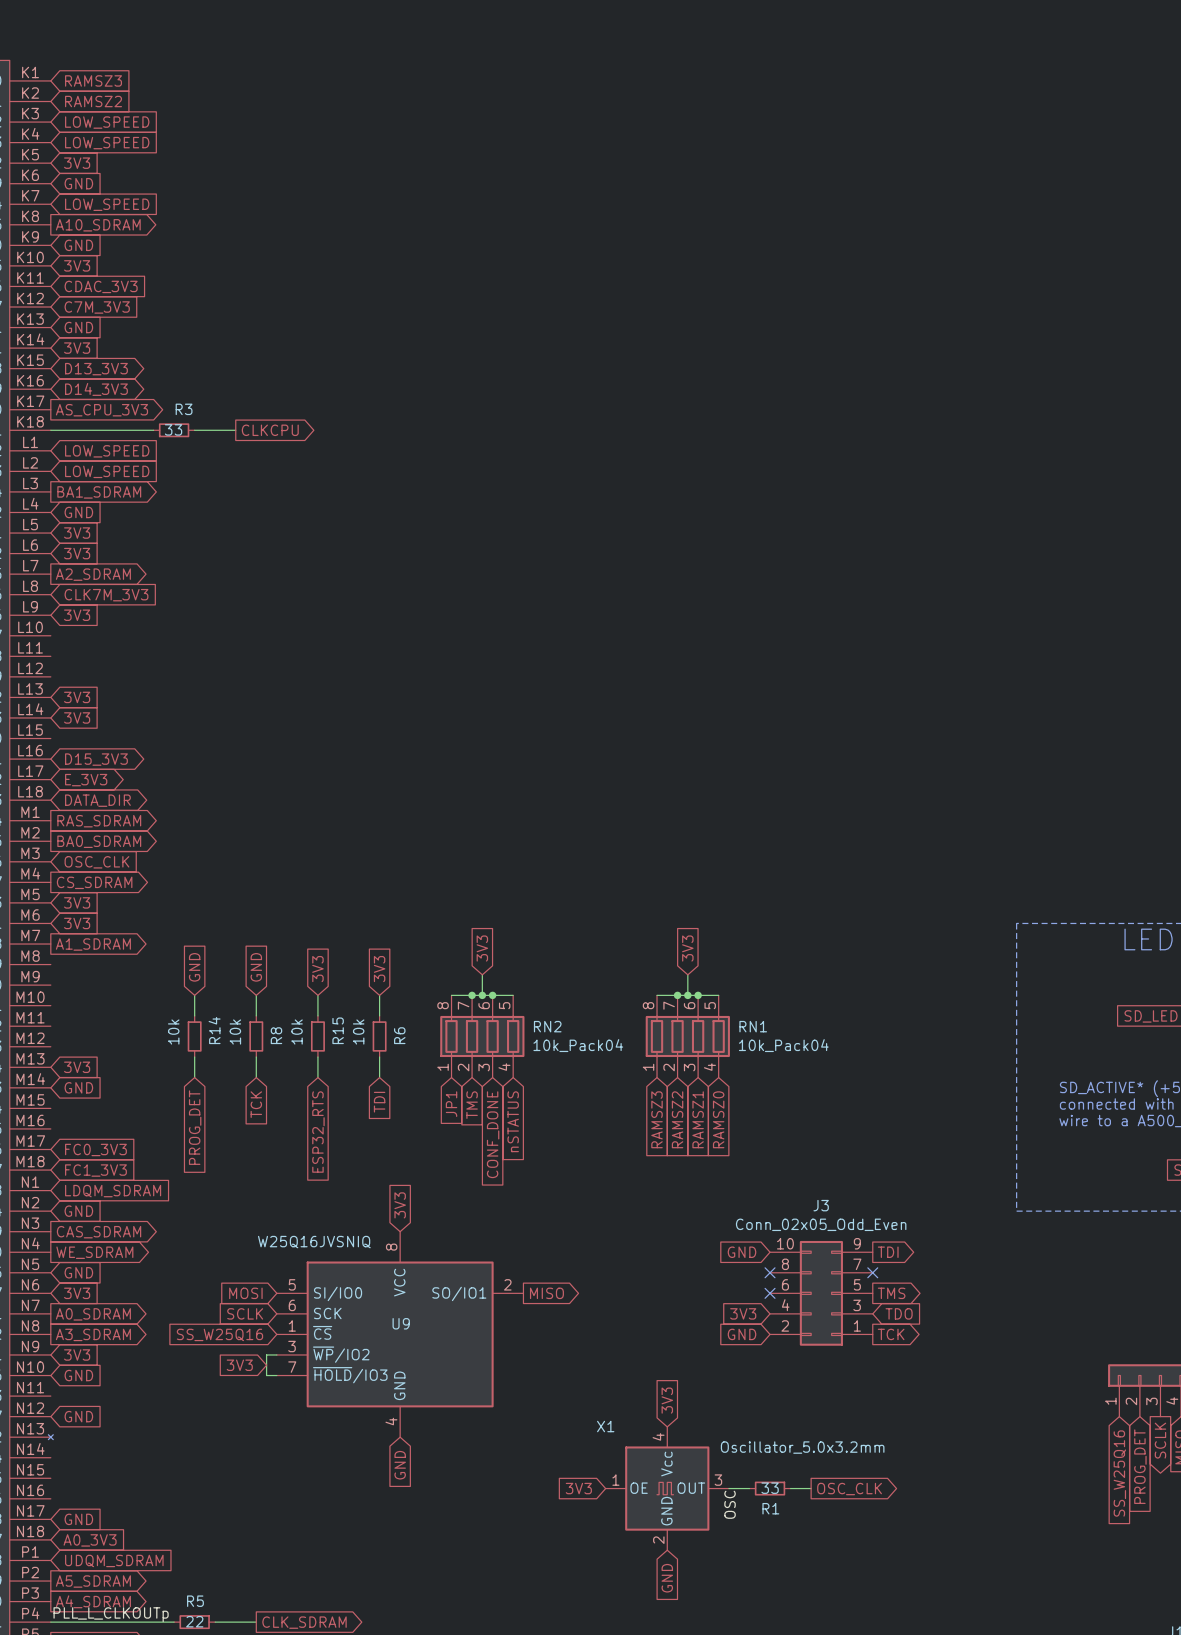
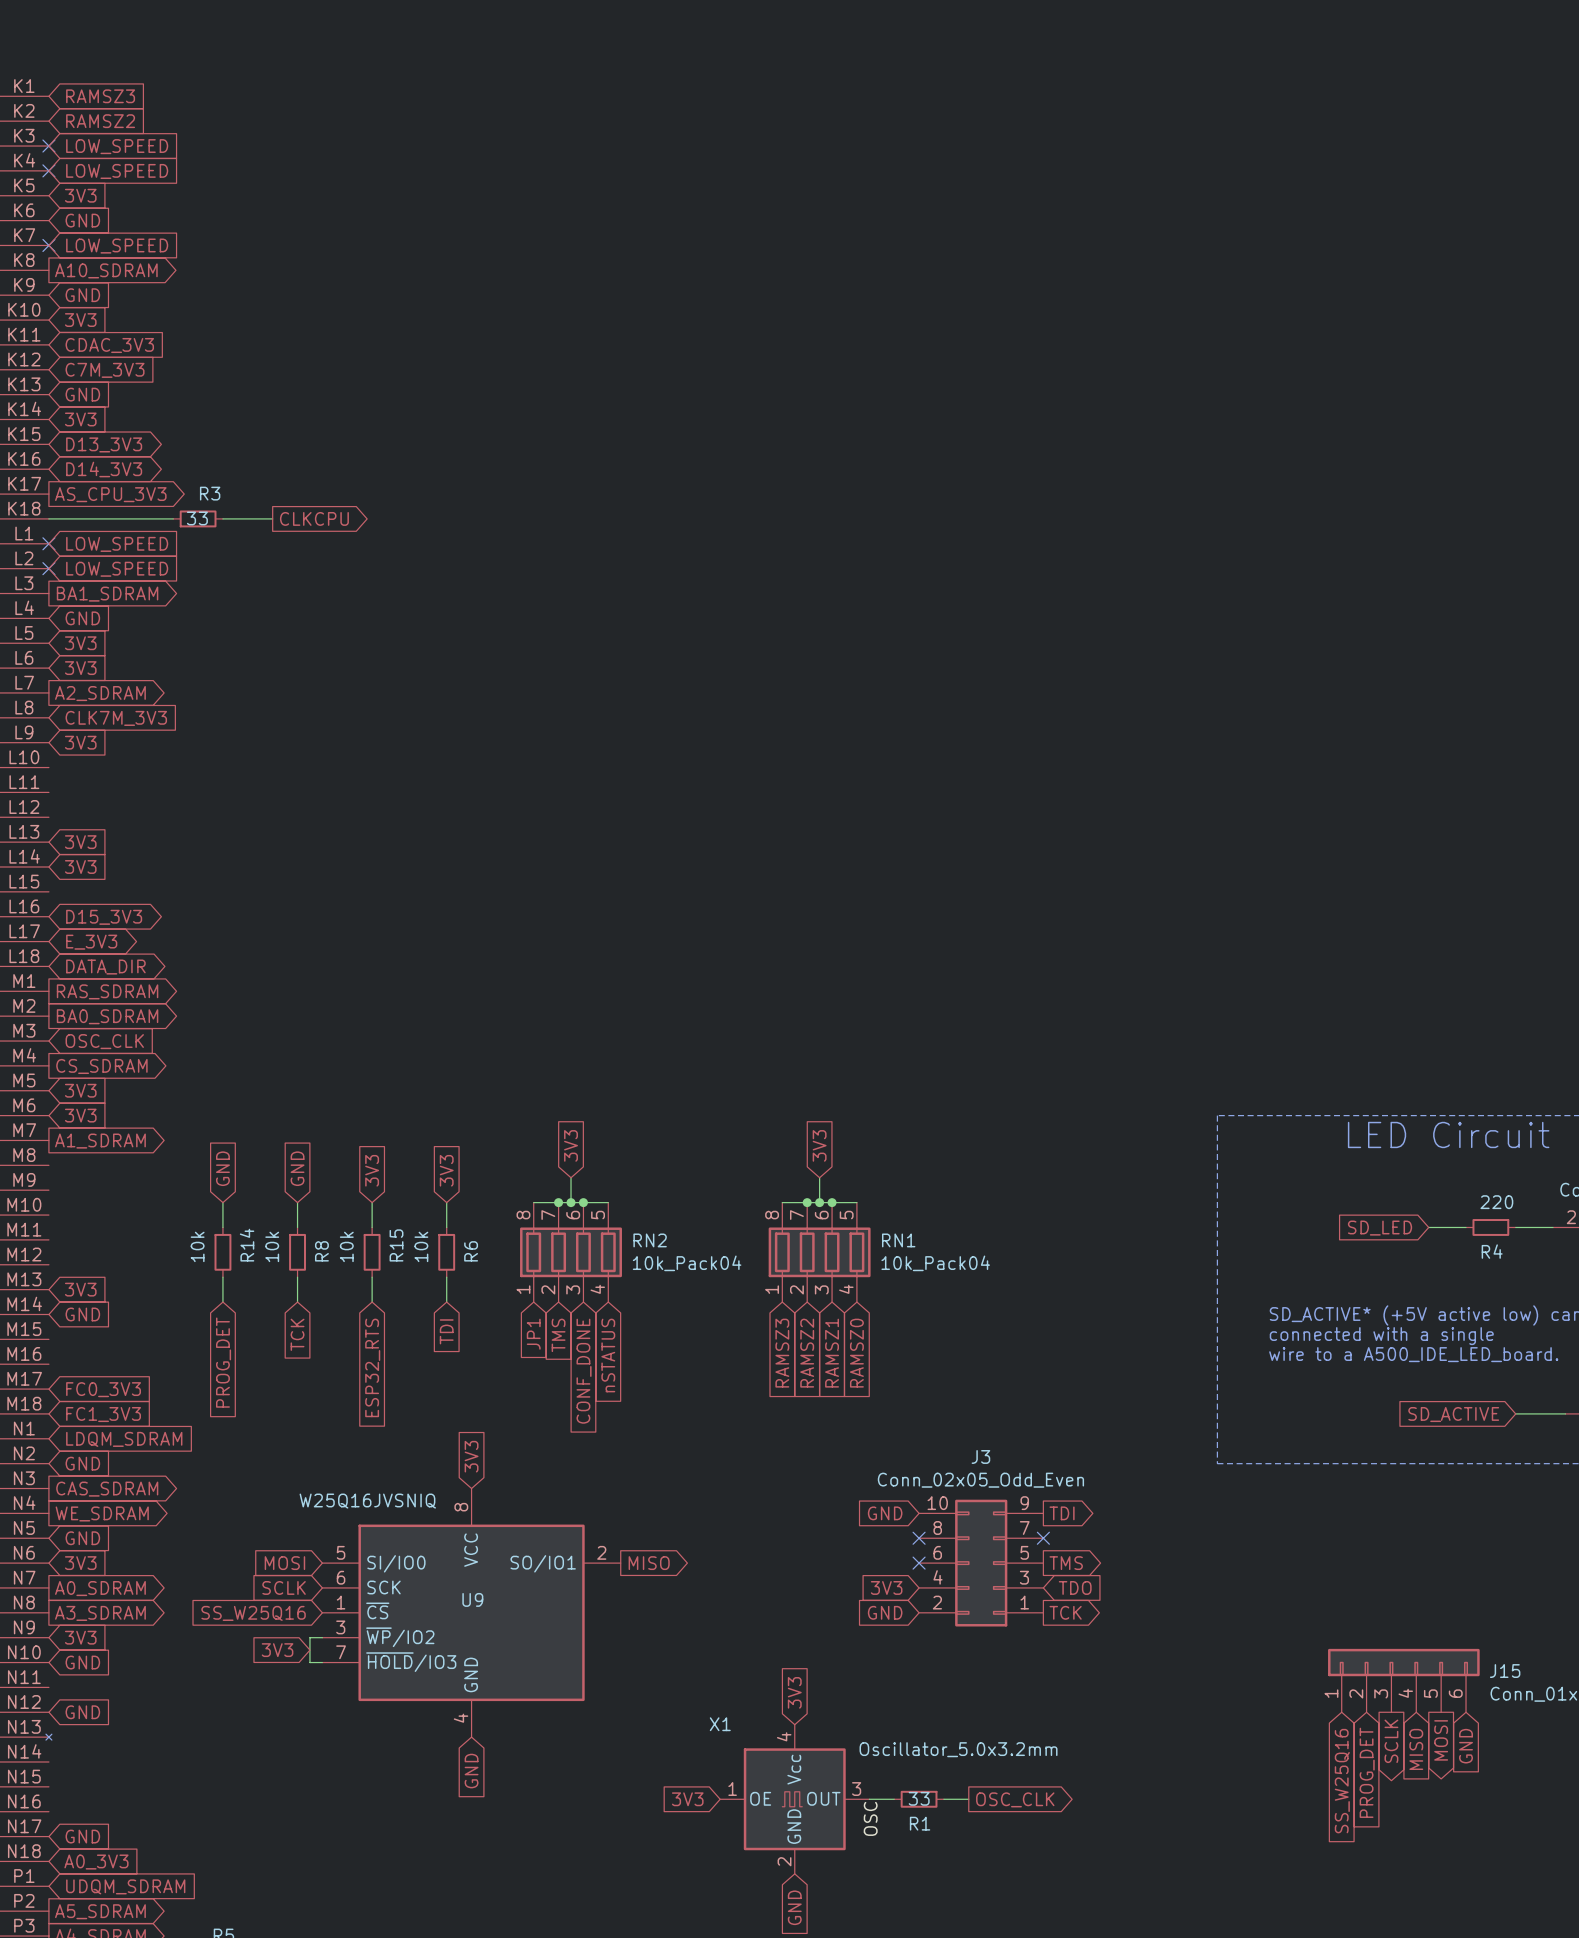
no-connect mark: none -> (48, 146)
no-connect mark: none -> (48, 170)
no-connect mark: none -> (48, 245)
no-connect mark: none -> (48, 543)
no-connect mark: none -> (48, 568)

